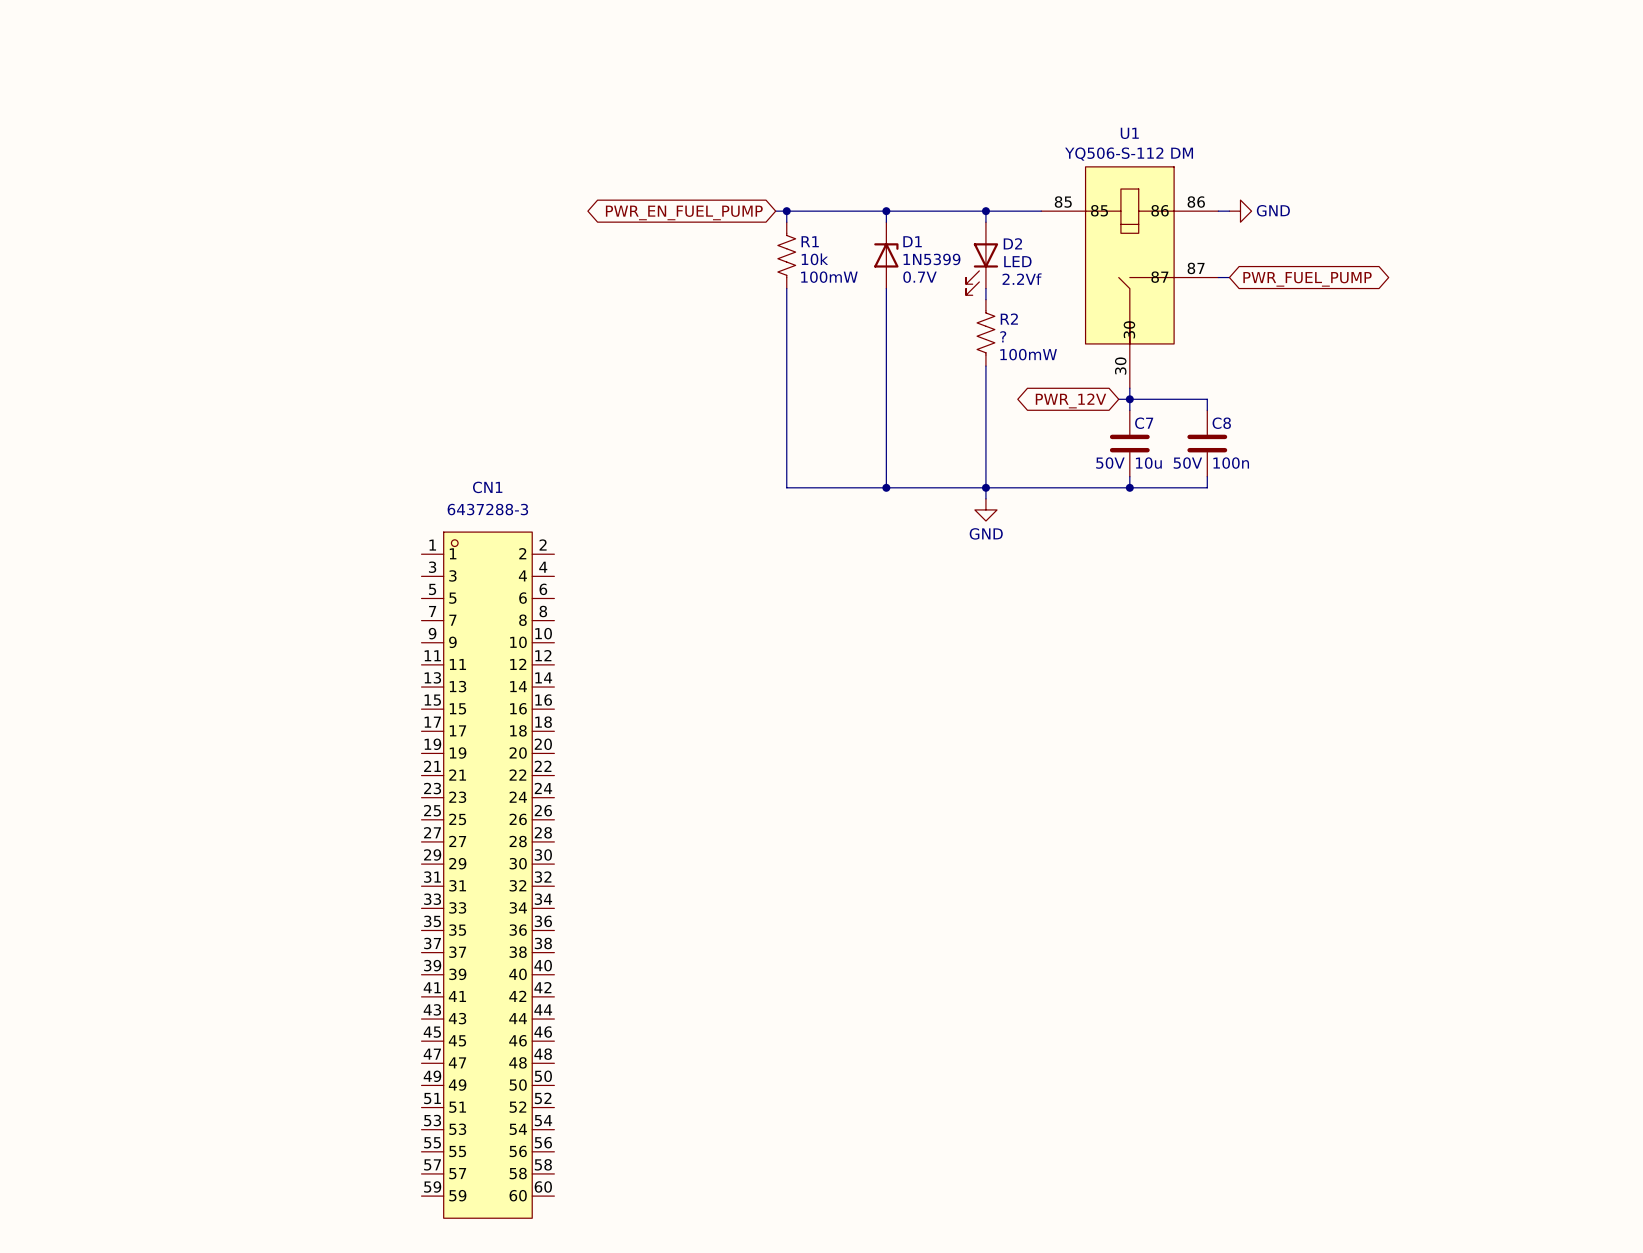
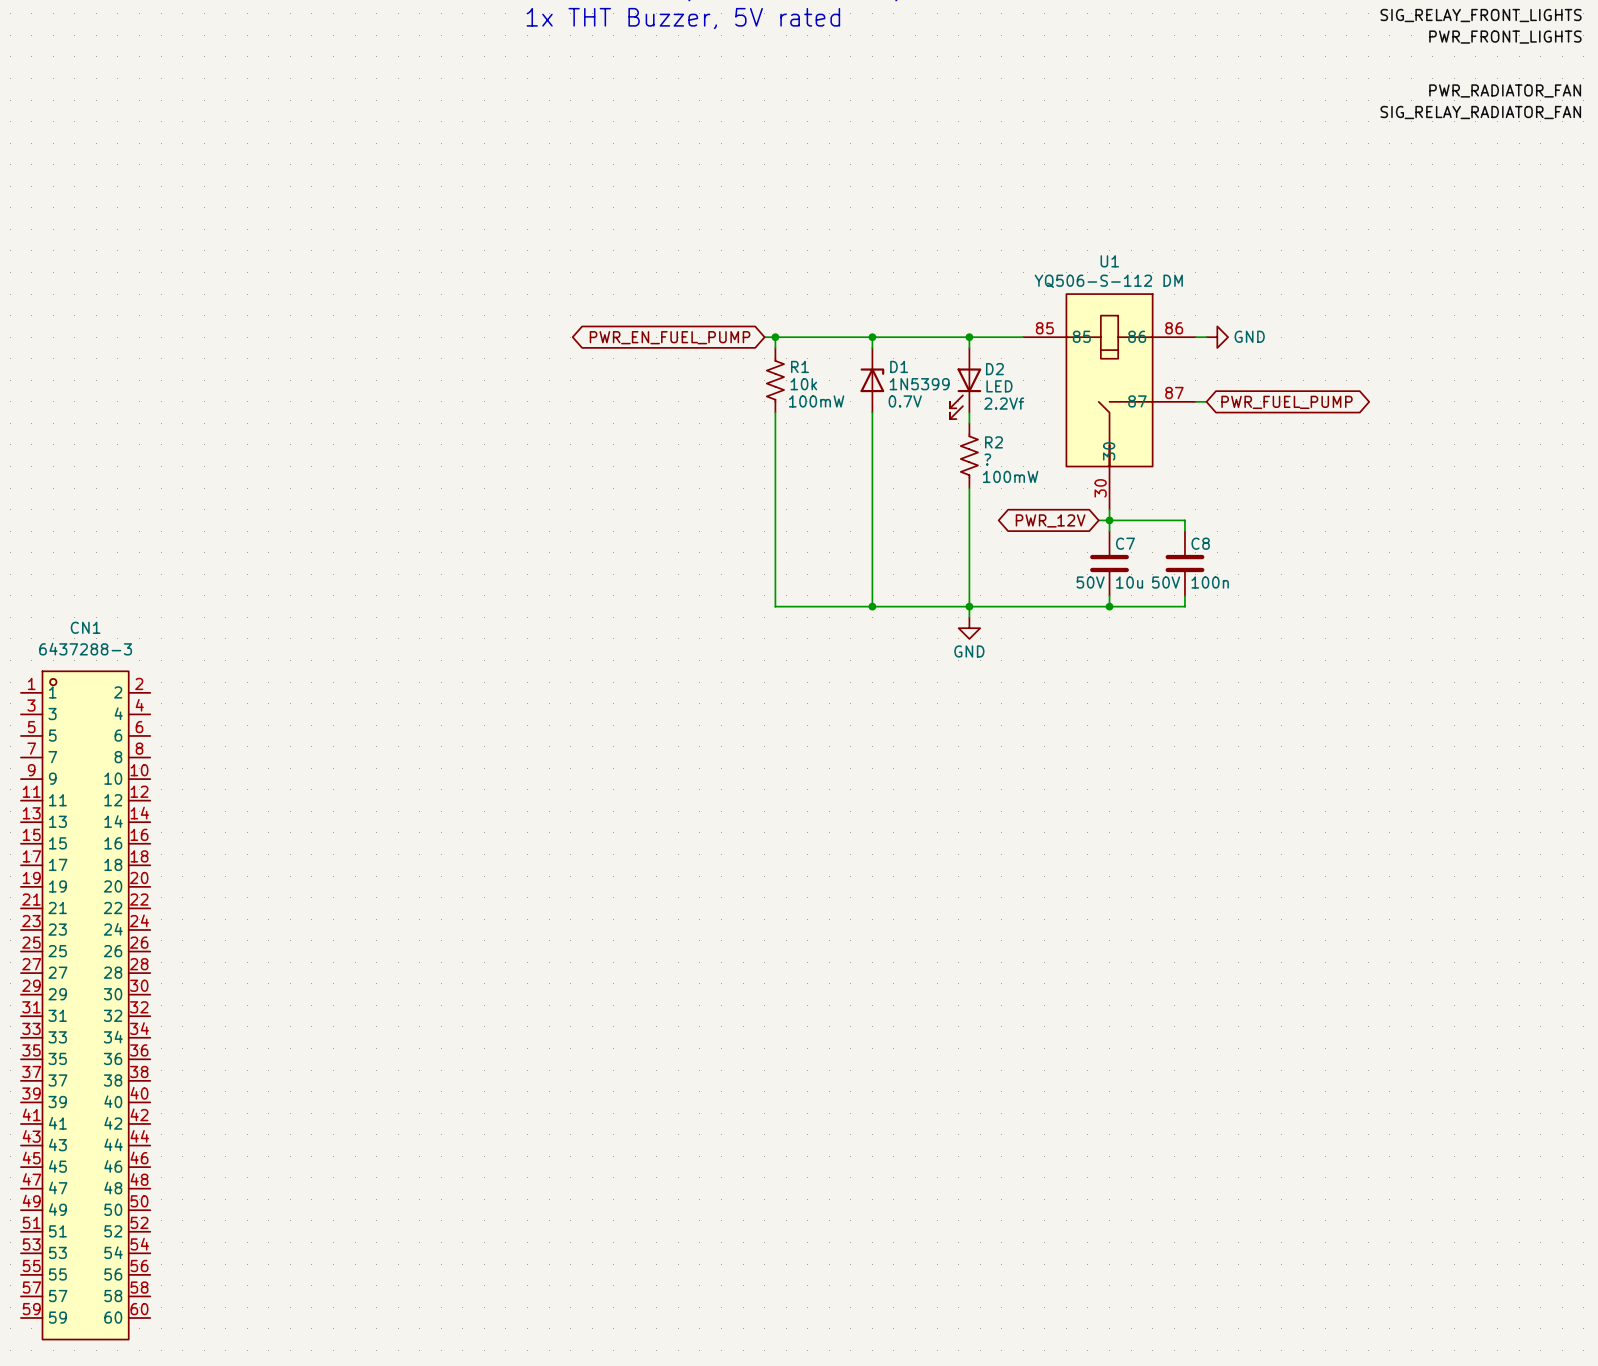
CN1 position: (487, 875) -> (85, 1005)

